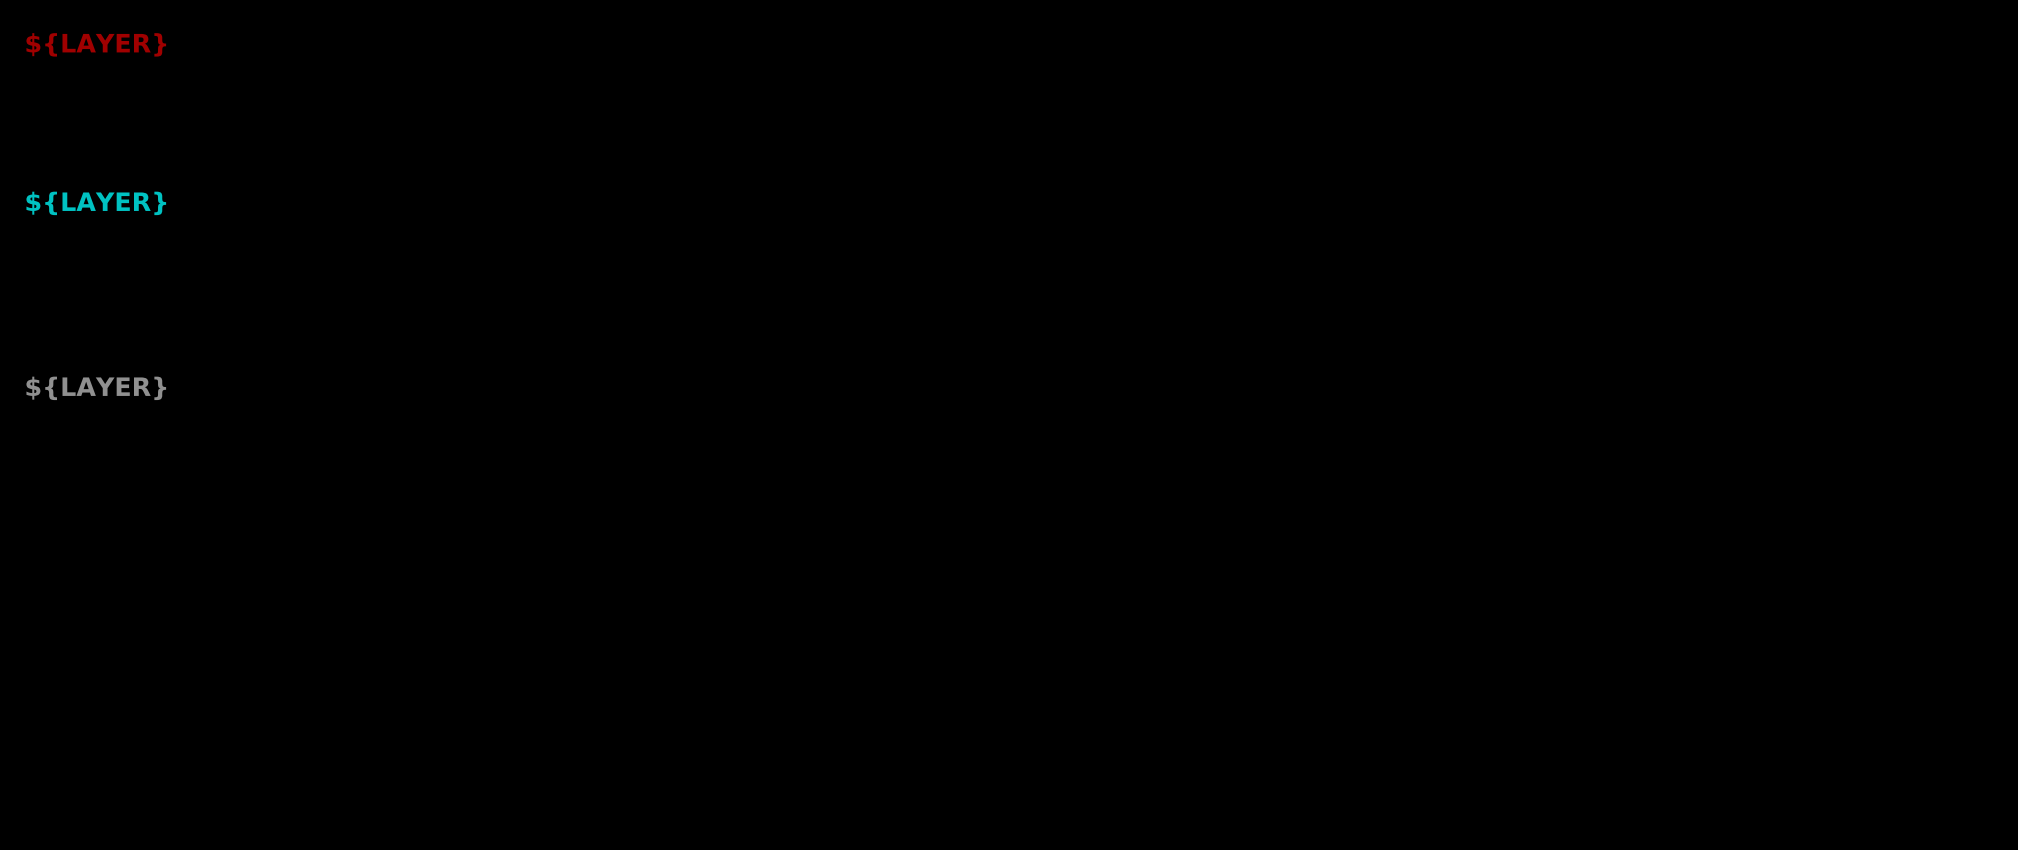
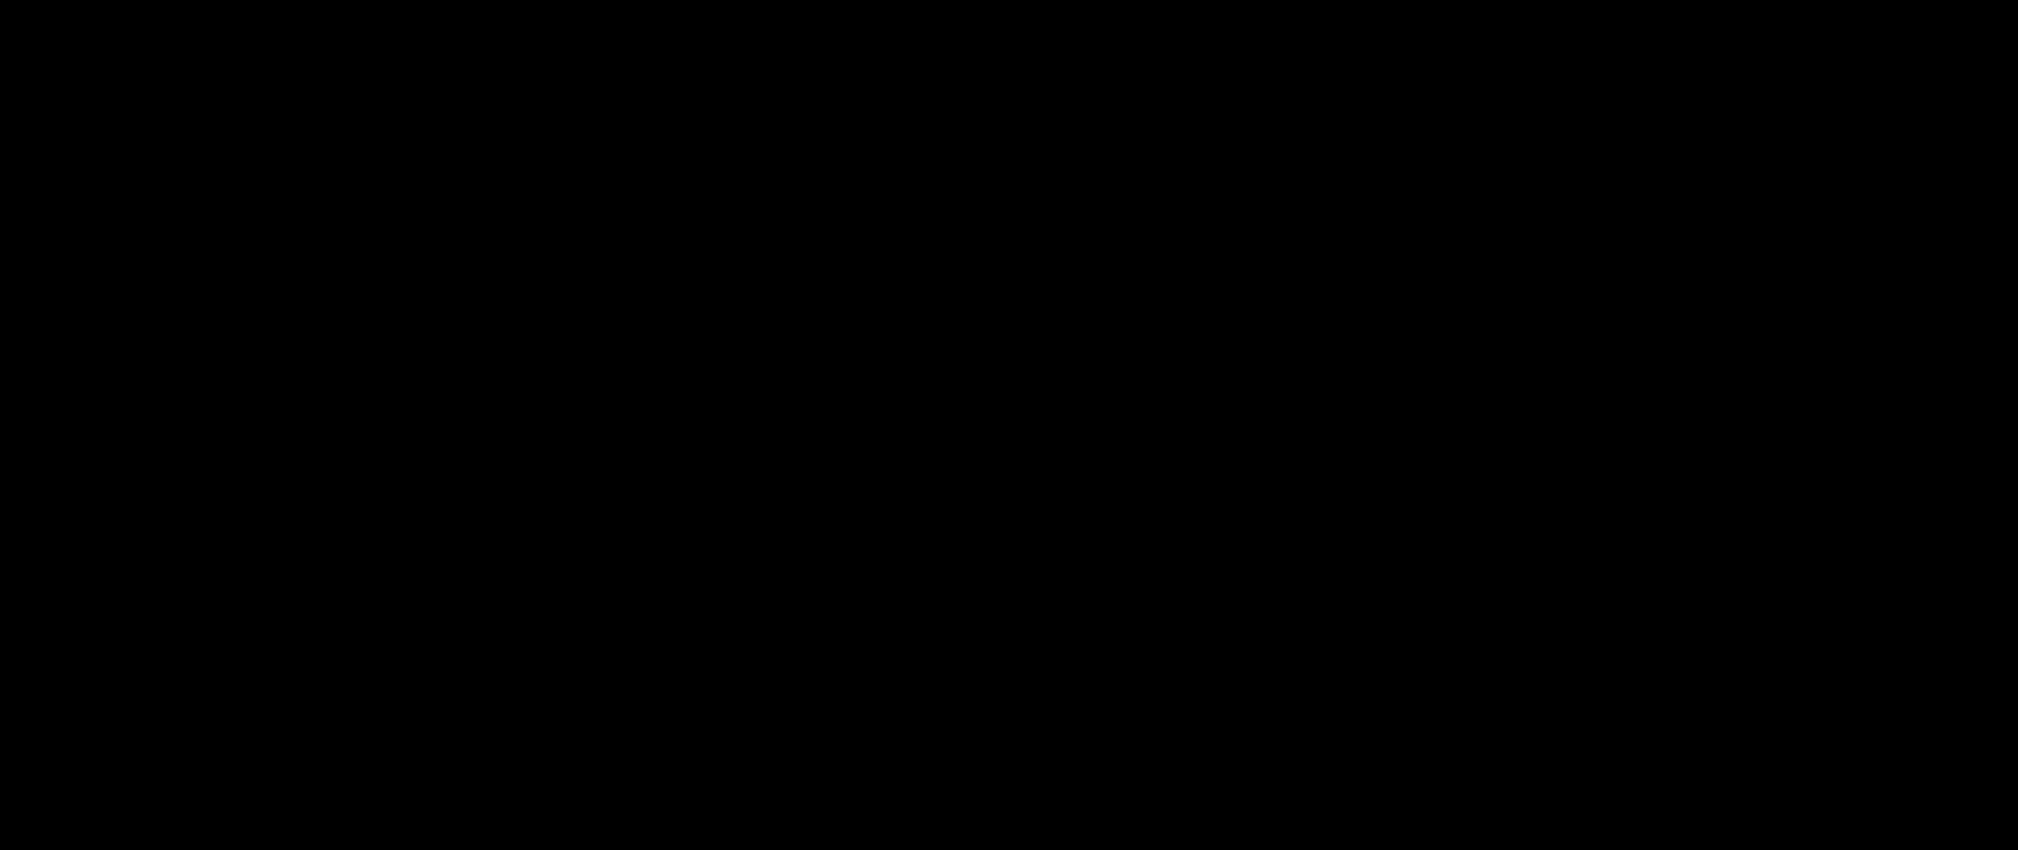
text: ${LAYER} (96, 44) -> none
text: ${LAYER} (96, 203) -> none
text: ${LAYER} (96, 388) -> none

